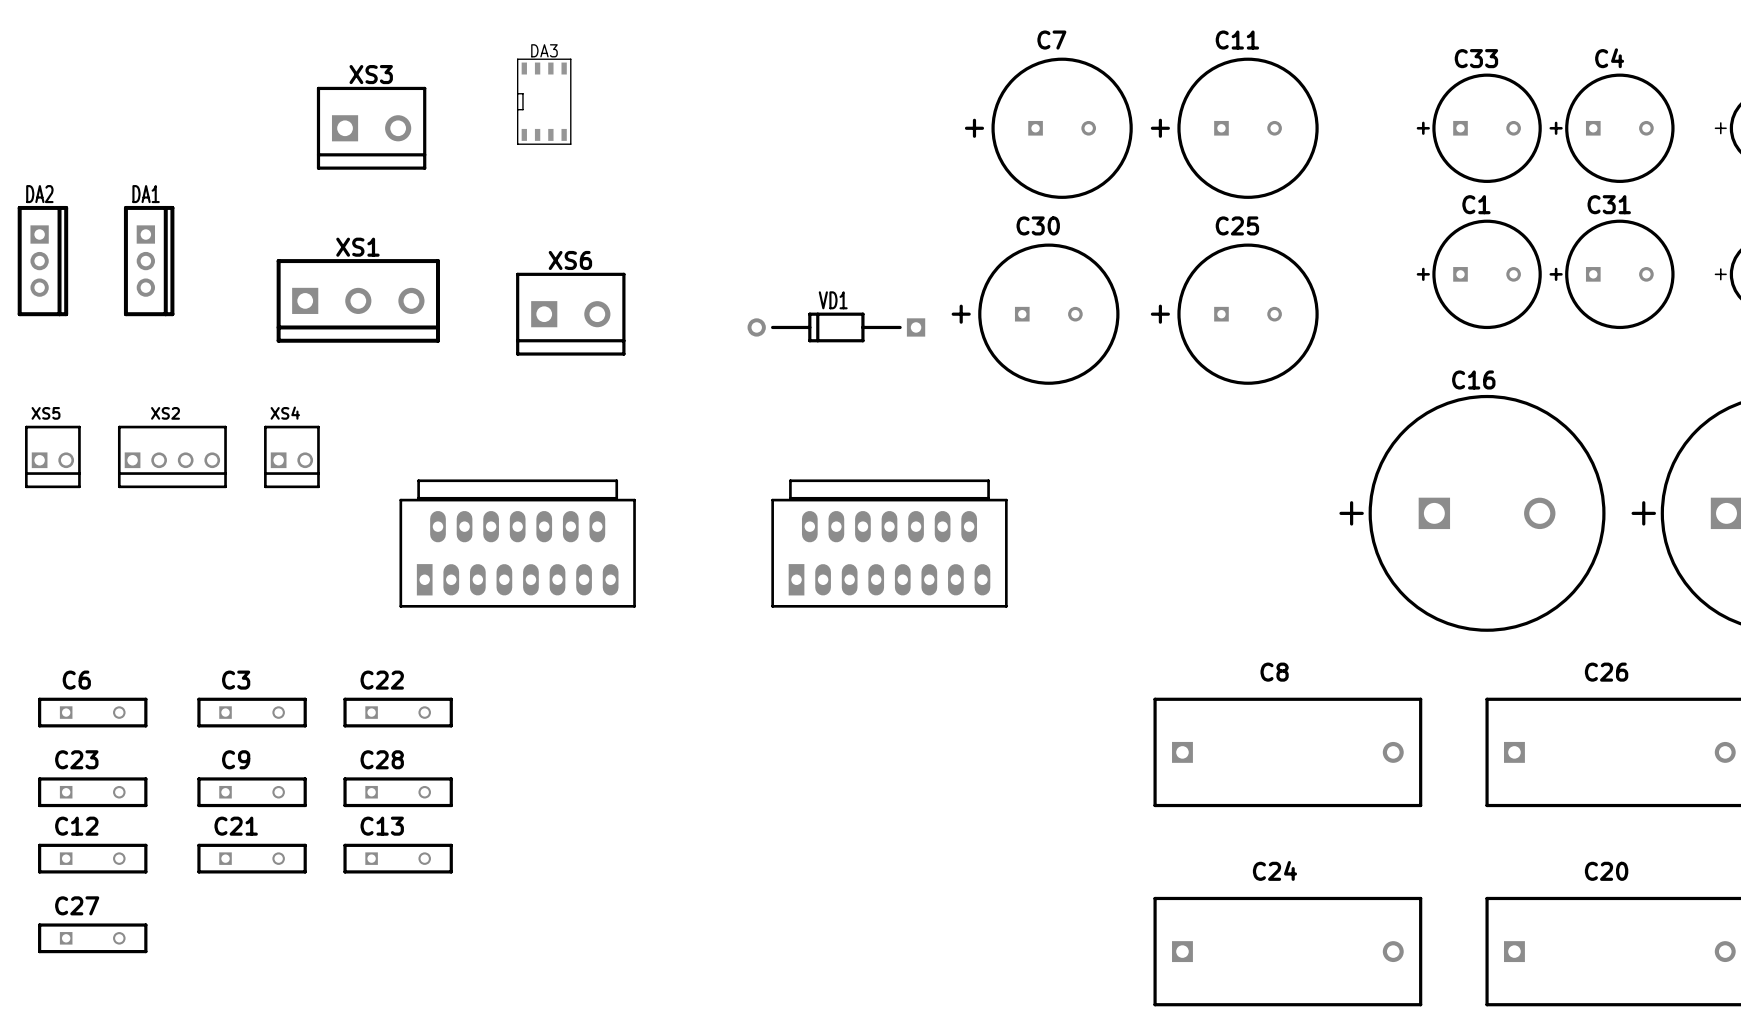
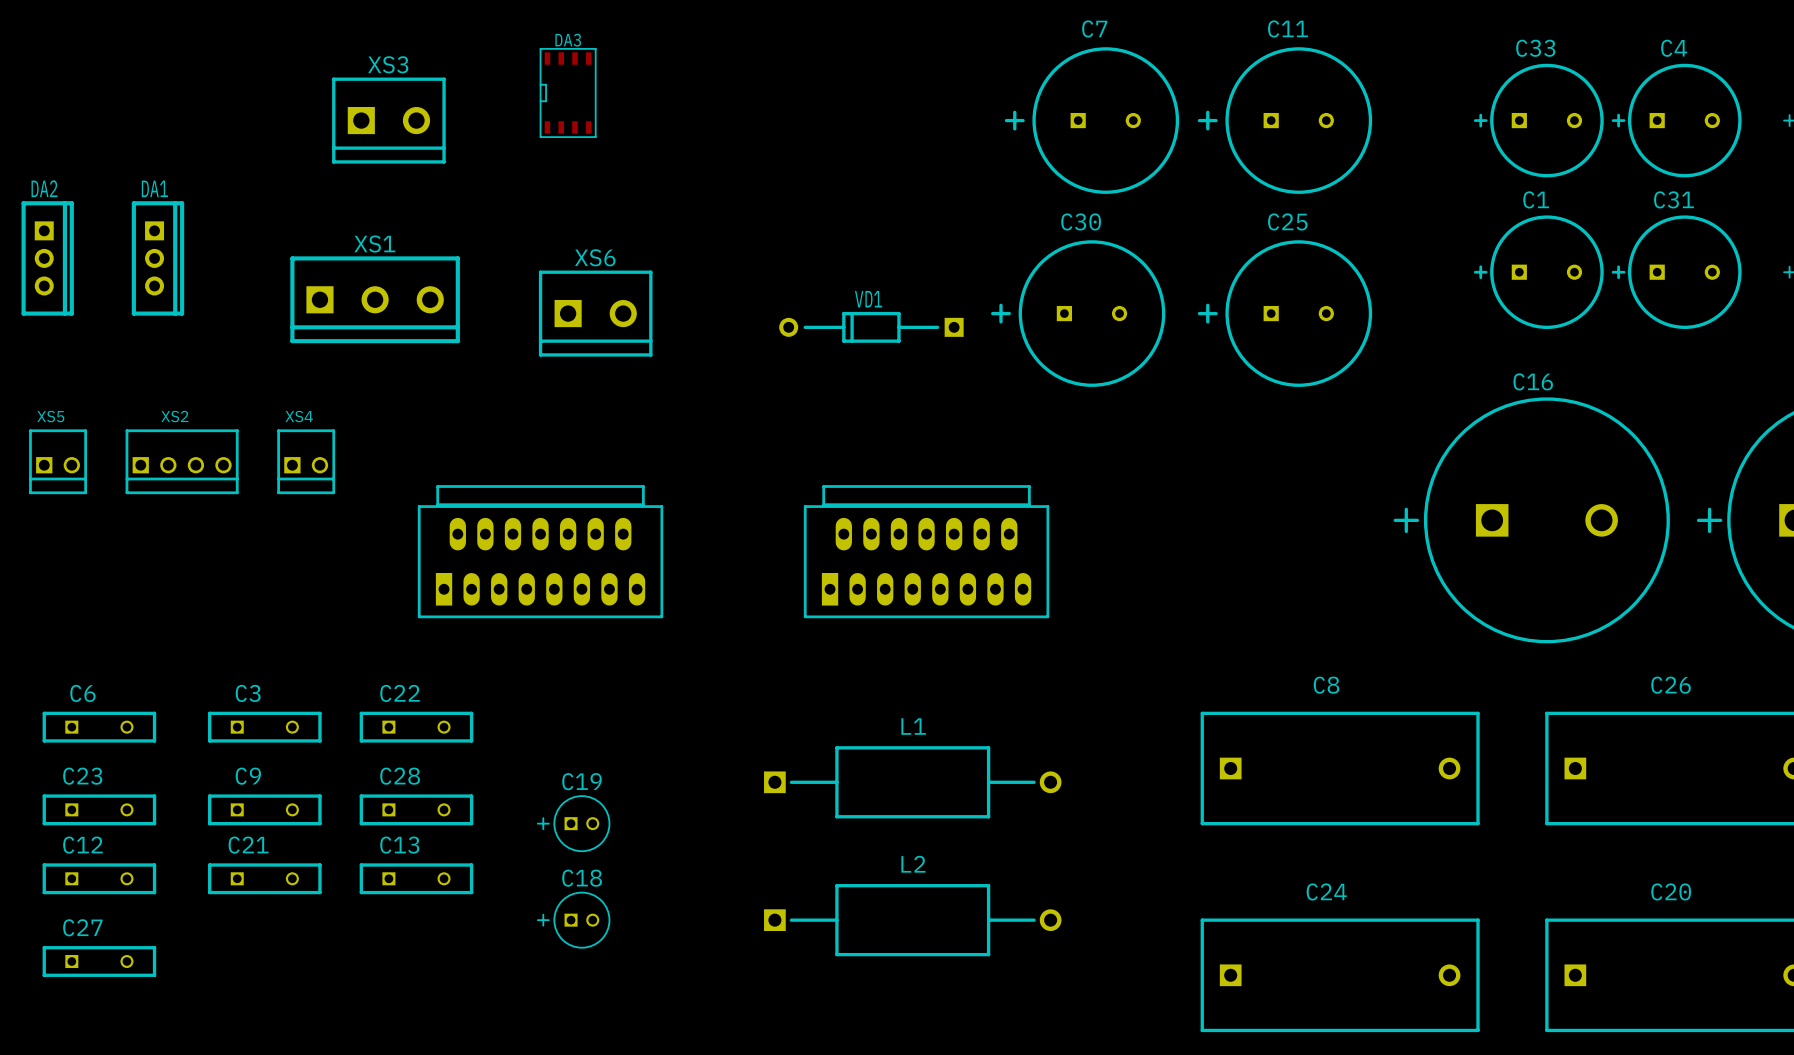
L1: none -> (912, 782)
C19: none -> (573, 823)
C18: none -> (573, 920)
L2: none -> (912, 920)

